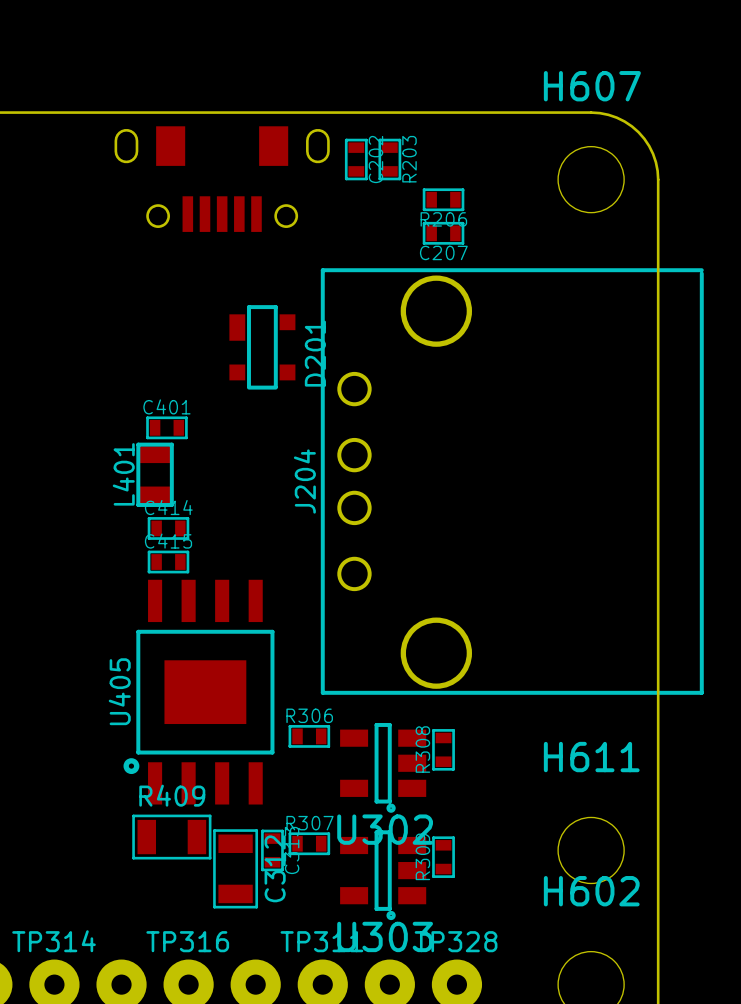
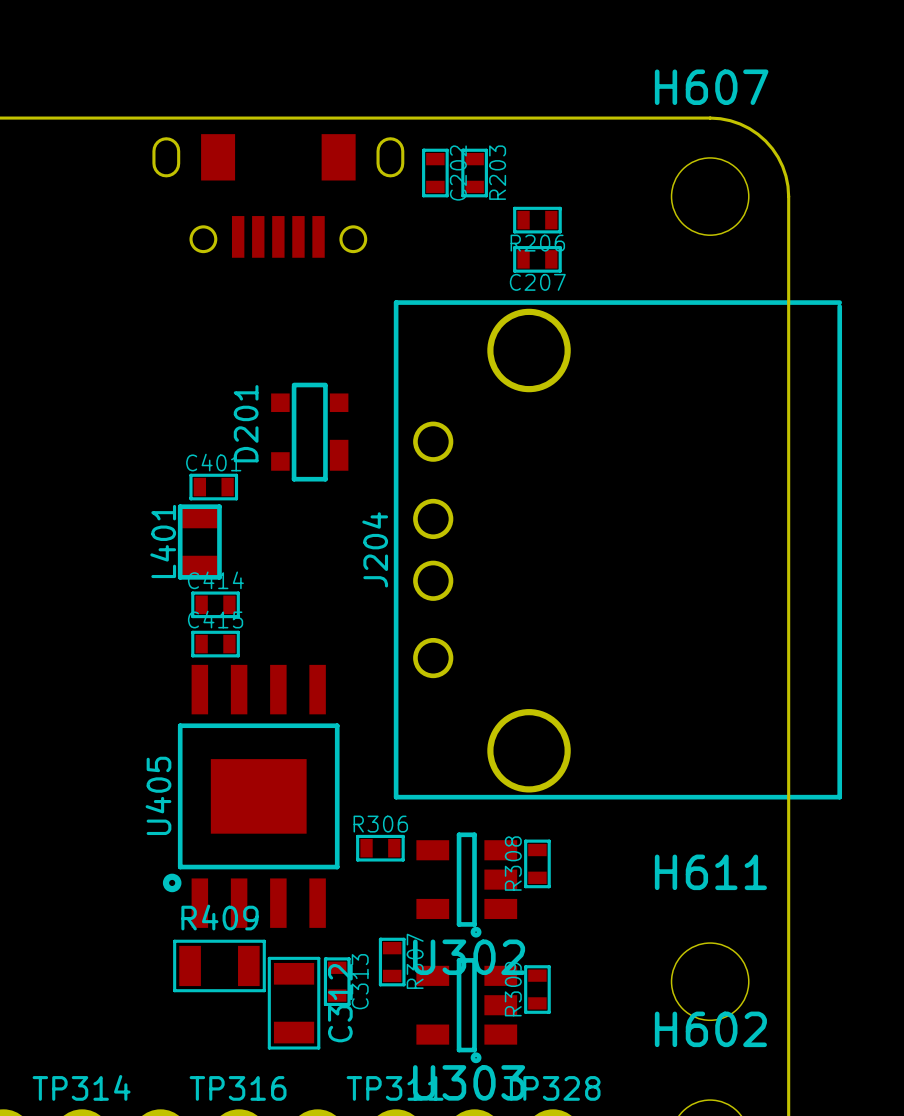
D201 rotation: 0° (262, 347) -> 180° (309, 432)
R307 rotation: 0° (309, 843) -> 90° clockwise (392, 962)

